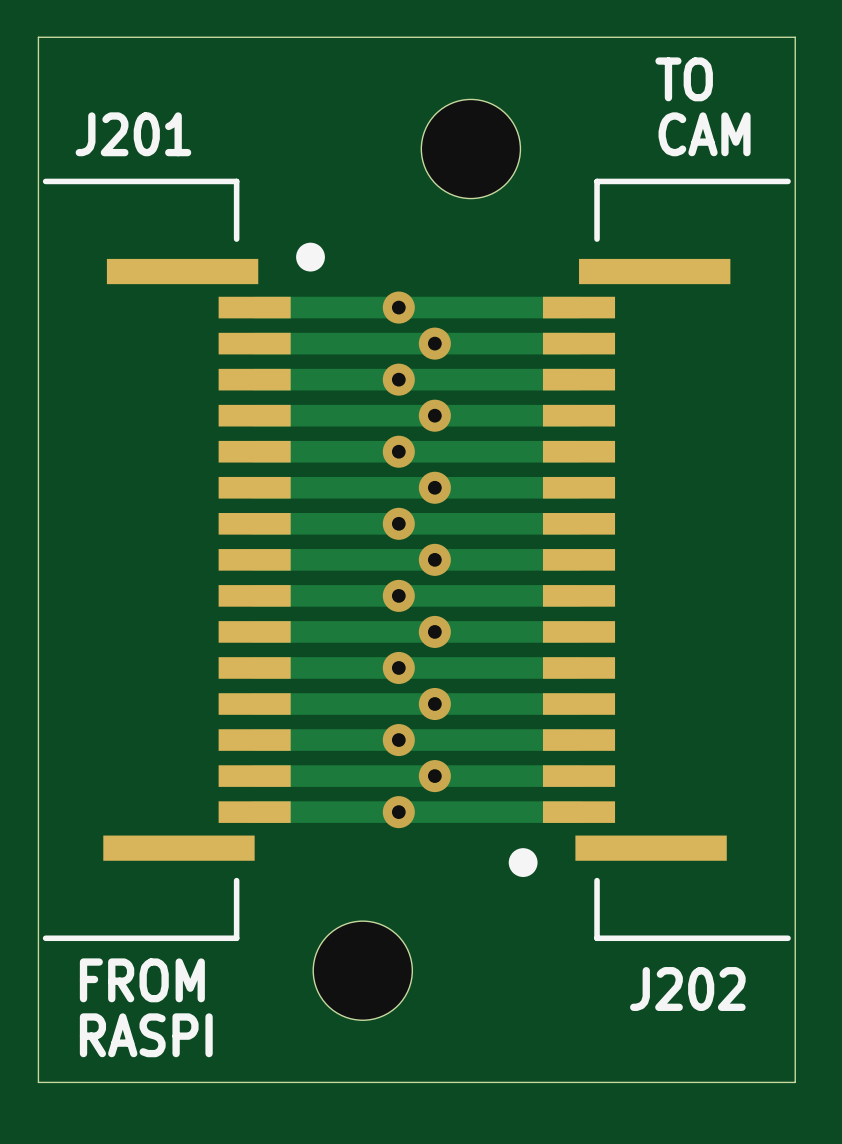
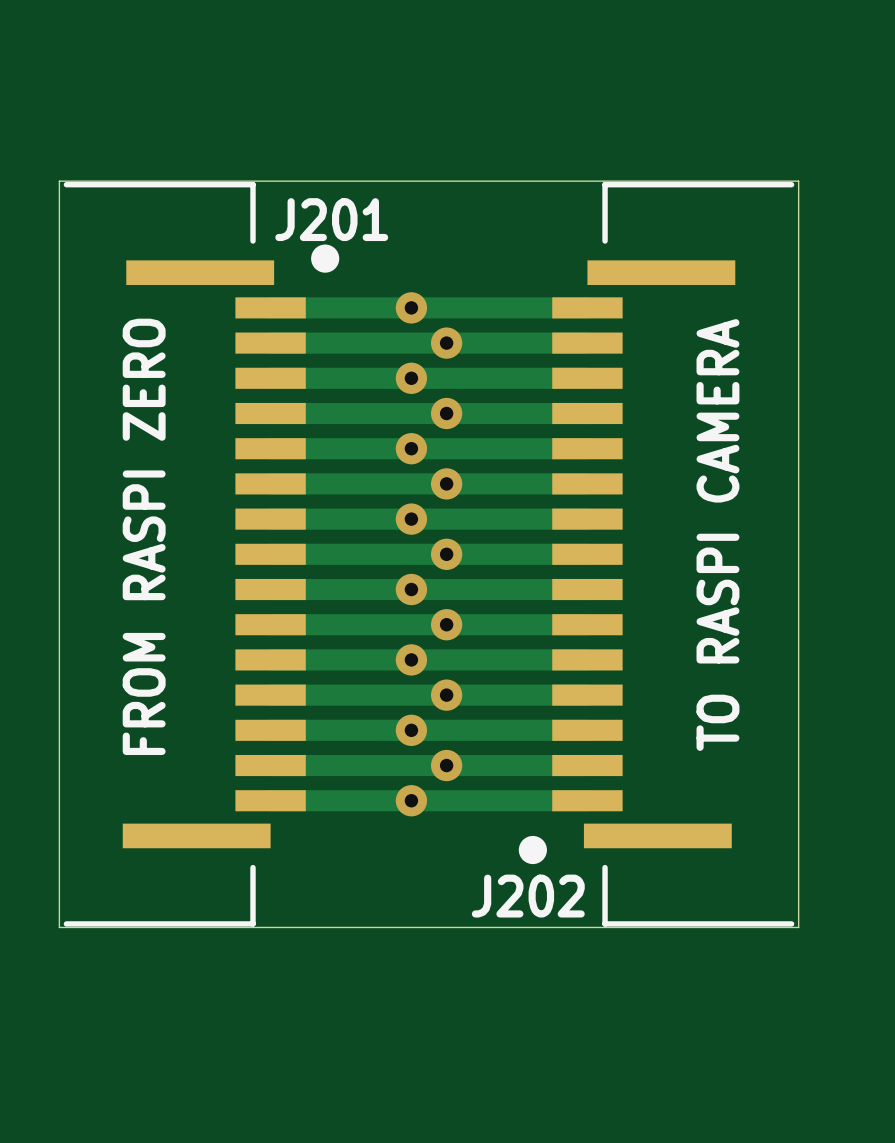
text: TO (684, 79) -> none
J201 name position: J201 (133, 134) -> J201 (331, 219)
text: CAM (704, 134) -> none
part: (470, 149) -> none
board edge: (38, 177) (38, 37) (795, 37) (795, 177) -> (59, 181) (798, 181)
text: none -> TO RASPI CAMERA (717, 535)
text: none -> FROM RASPI ZERO (144, 536)
board edge: (38, 941) (38, 1082) (795, 1082) (795, 941) -> (59, 927) (798, 927)
part: (362, 970) -> none
text: FROM (142, 980) -> none
J202 name position: J202 (687, 989) -> J202 (528, 896)
text: RASPI (146, 1035) -> none

